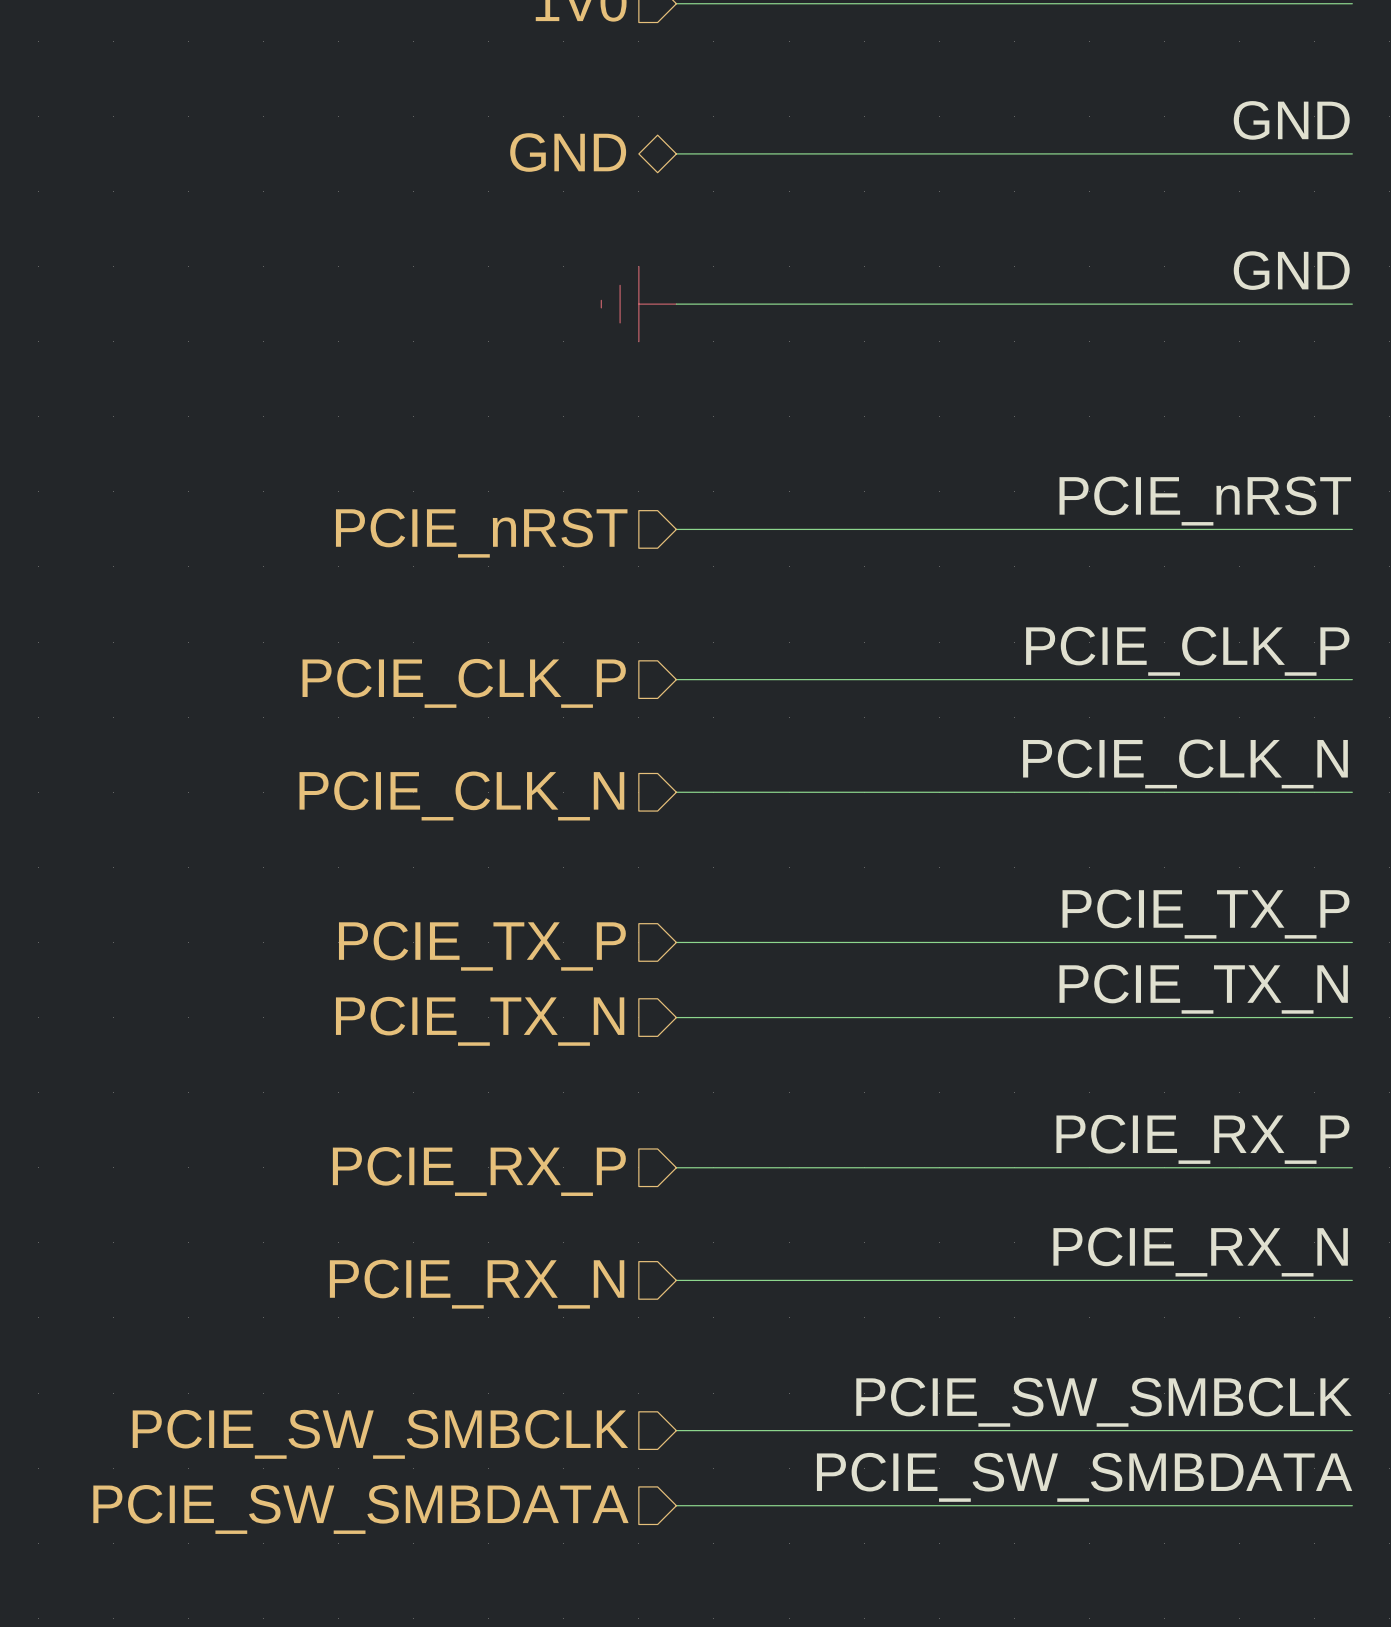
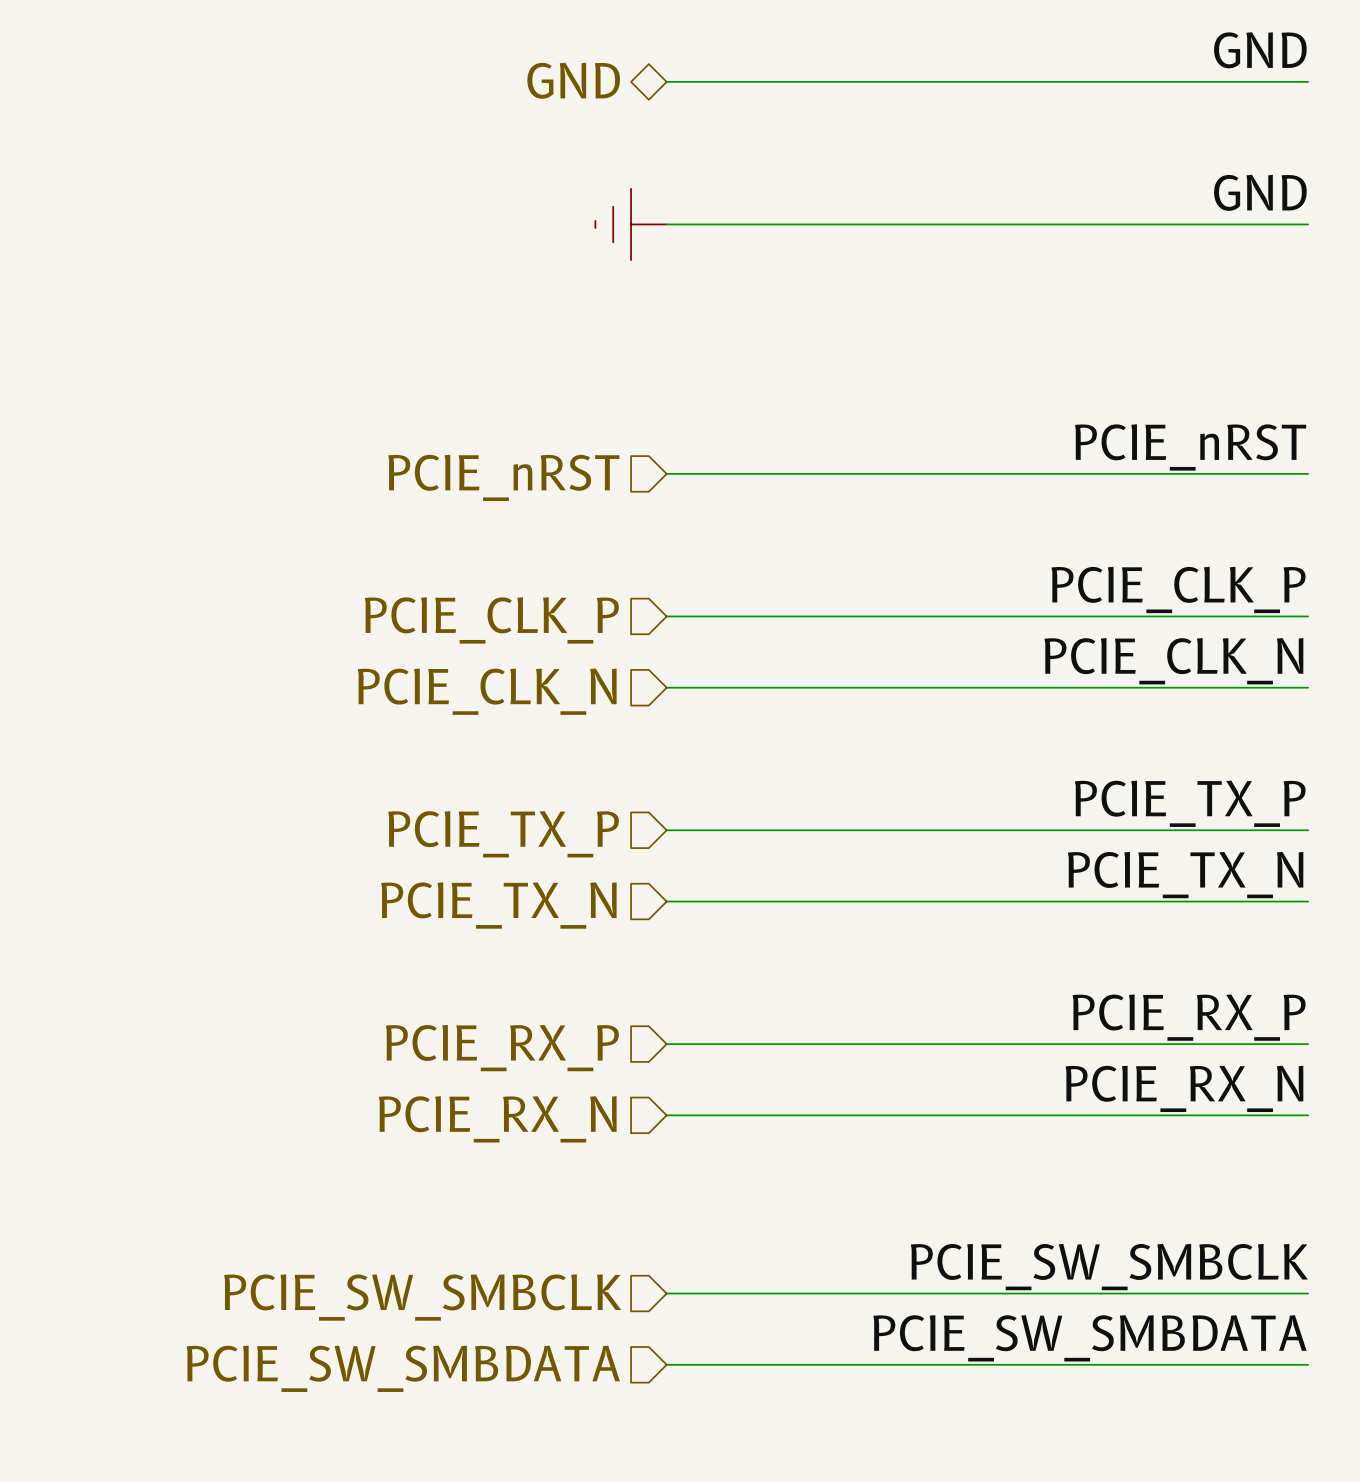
label position: PCIE_nRST (1205, 501) -> PCIE_nRST (1190, 447)
wire: (676, 529) (1352, 529) -> (666, 473) (1308, 473)
hierarchical label position: PCIE_nRST (481, 533) -> PCIE_nRST (503, 477)
label position: PCIE_CLK_P (1187, 651) -> PCIE_CLK_P (1178, 589)
wire: (676, 679) (1352, 679) -> (666, 616) (1308, 616)
hierarchical label position: PCIE_CLK_P (464, 683) -> PCIE_CLK_P (491, 620)
label position: PCIE_RX_N (1200, 1252) -> PCIE_RX_N (1184, 1088)
wire: (676, 1280) (1352, 1280) -> (666, 1115) (1308, 1115)
hierarchical label position: PCIE_RX_N (477, 1284) -> PCIE_RX_N (497, 1119)

